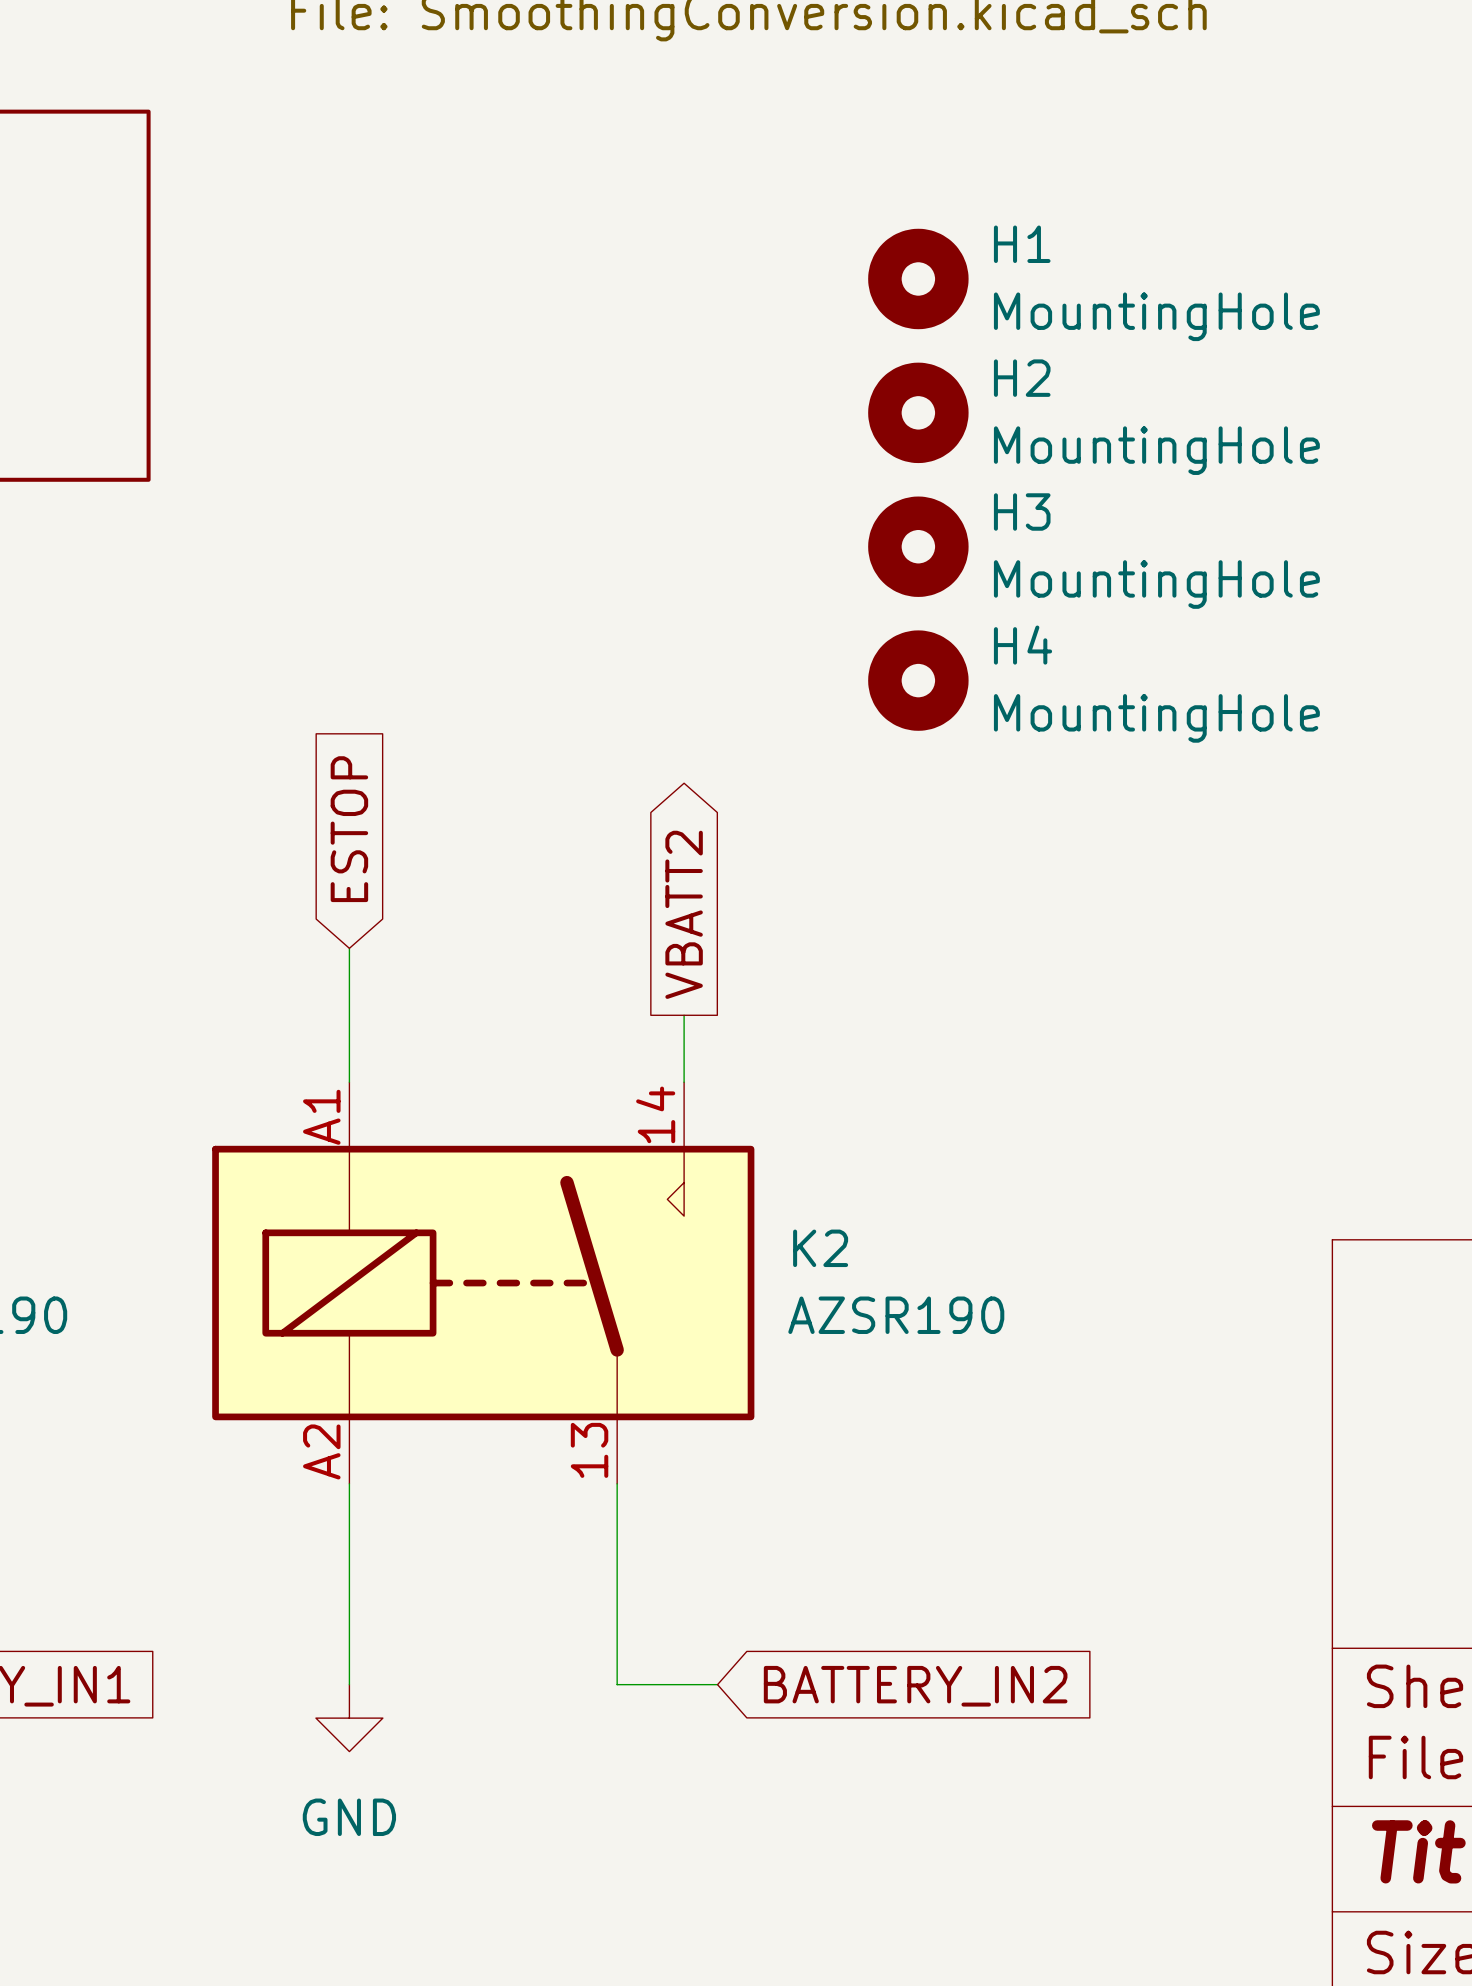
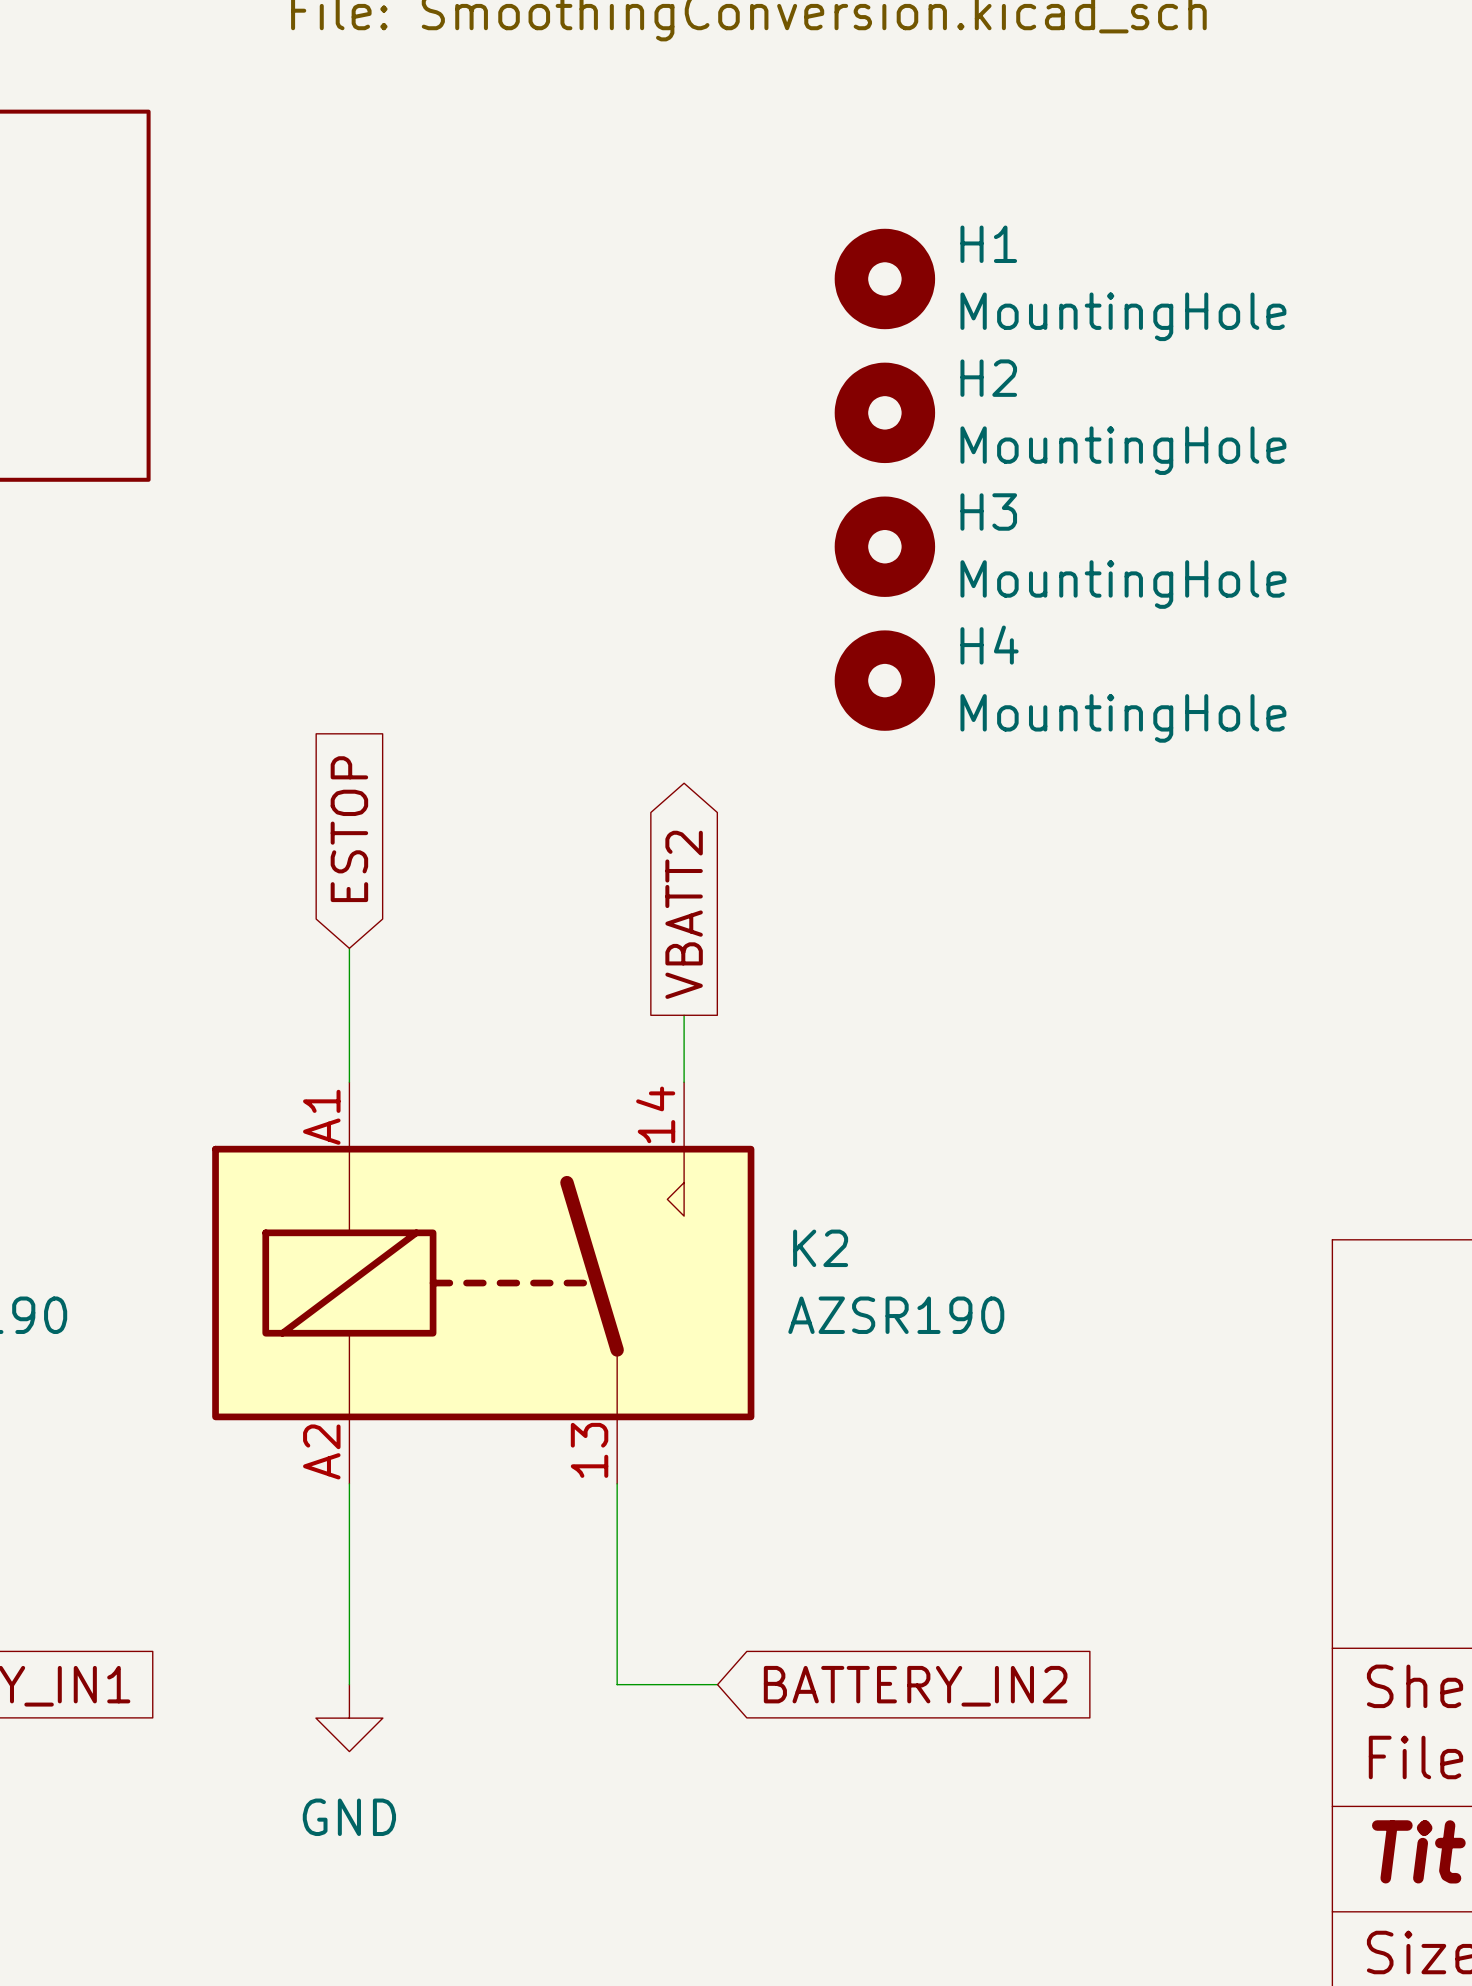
H1 position: (918, 278) -> (884, 278)
H2 position: (918, 412) -> (884, 412)
H3 position: (918, 546) -> (884, 546)
H4 position: (918, 680) -> (884, 680)

